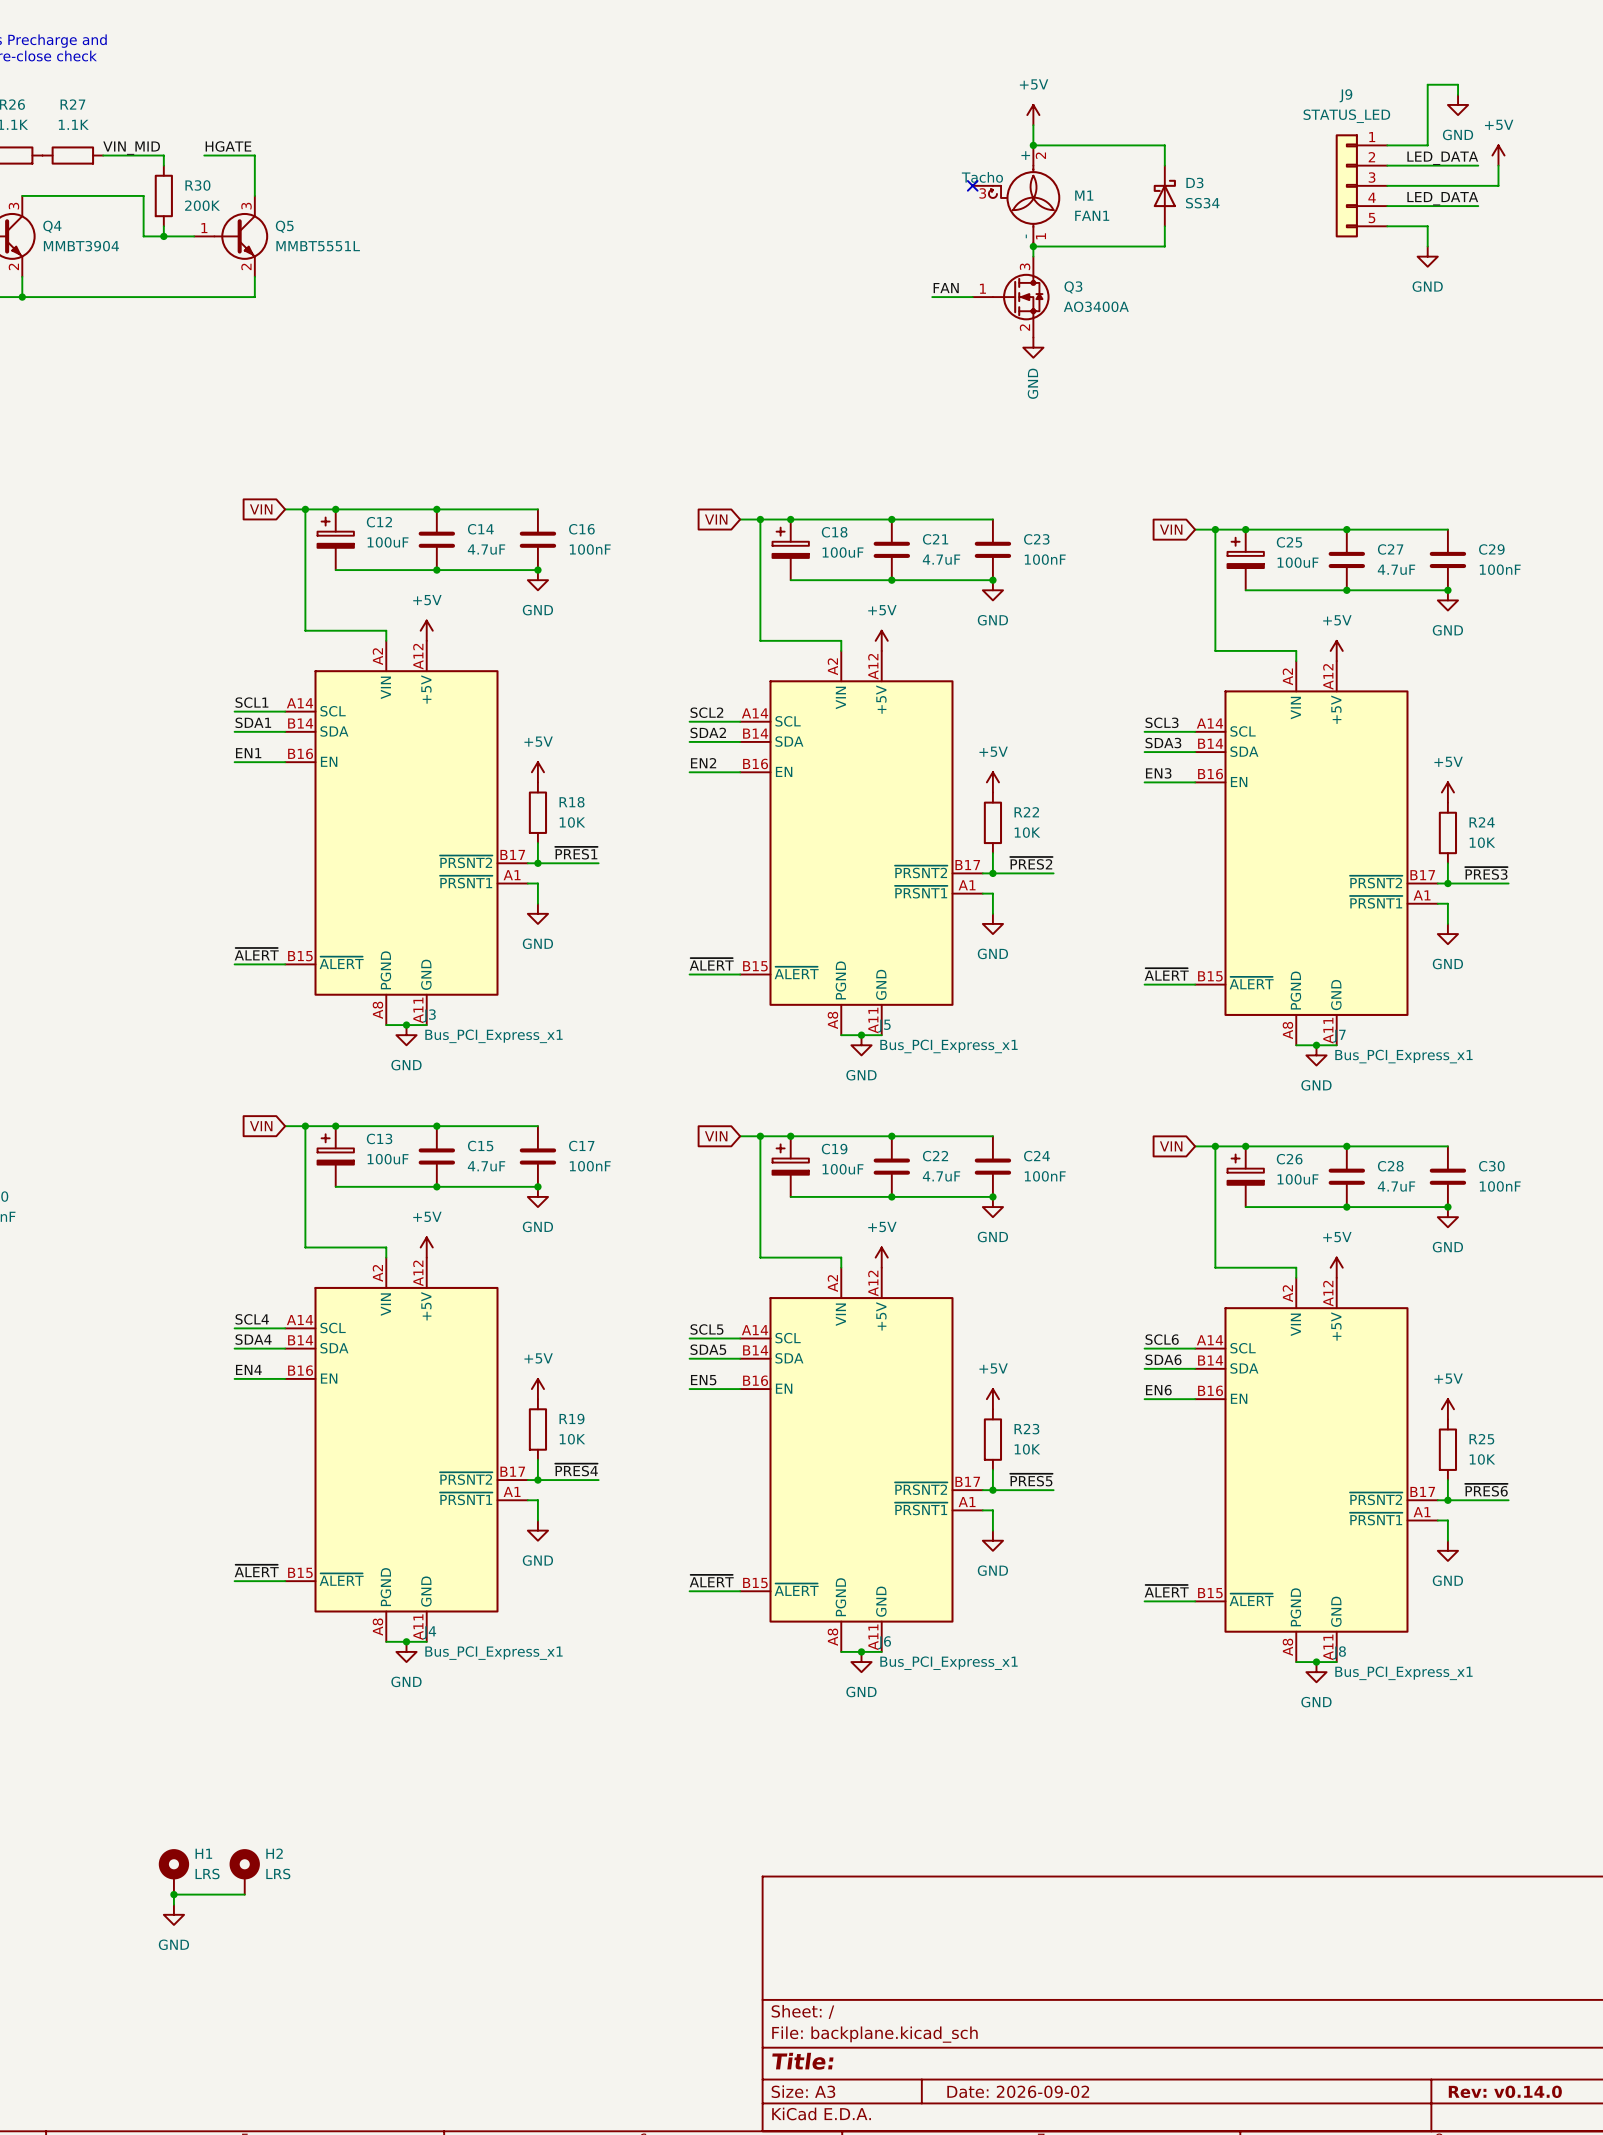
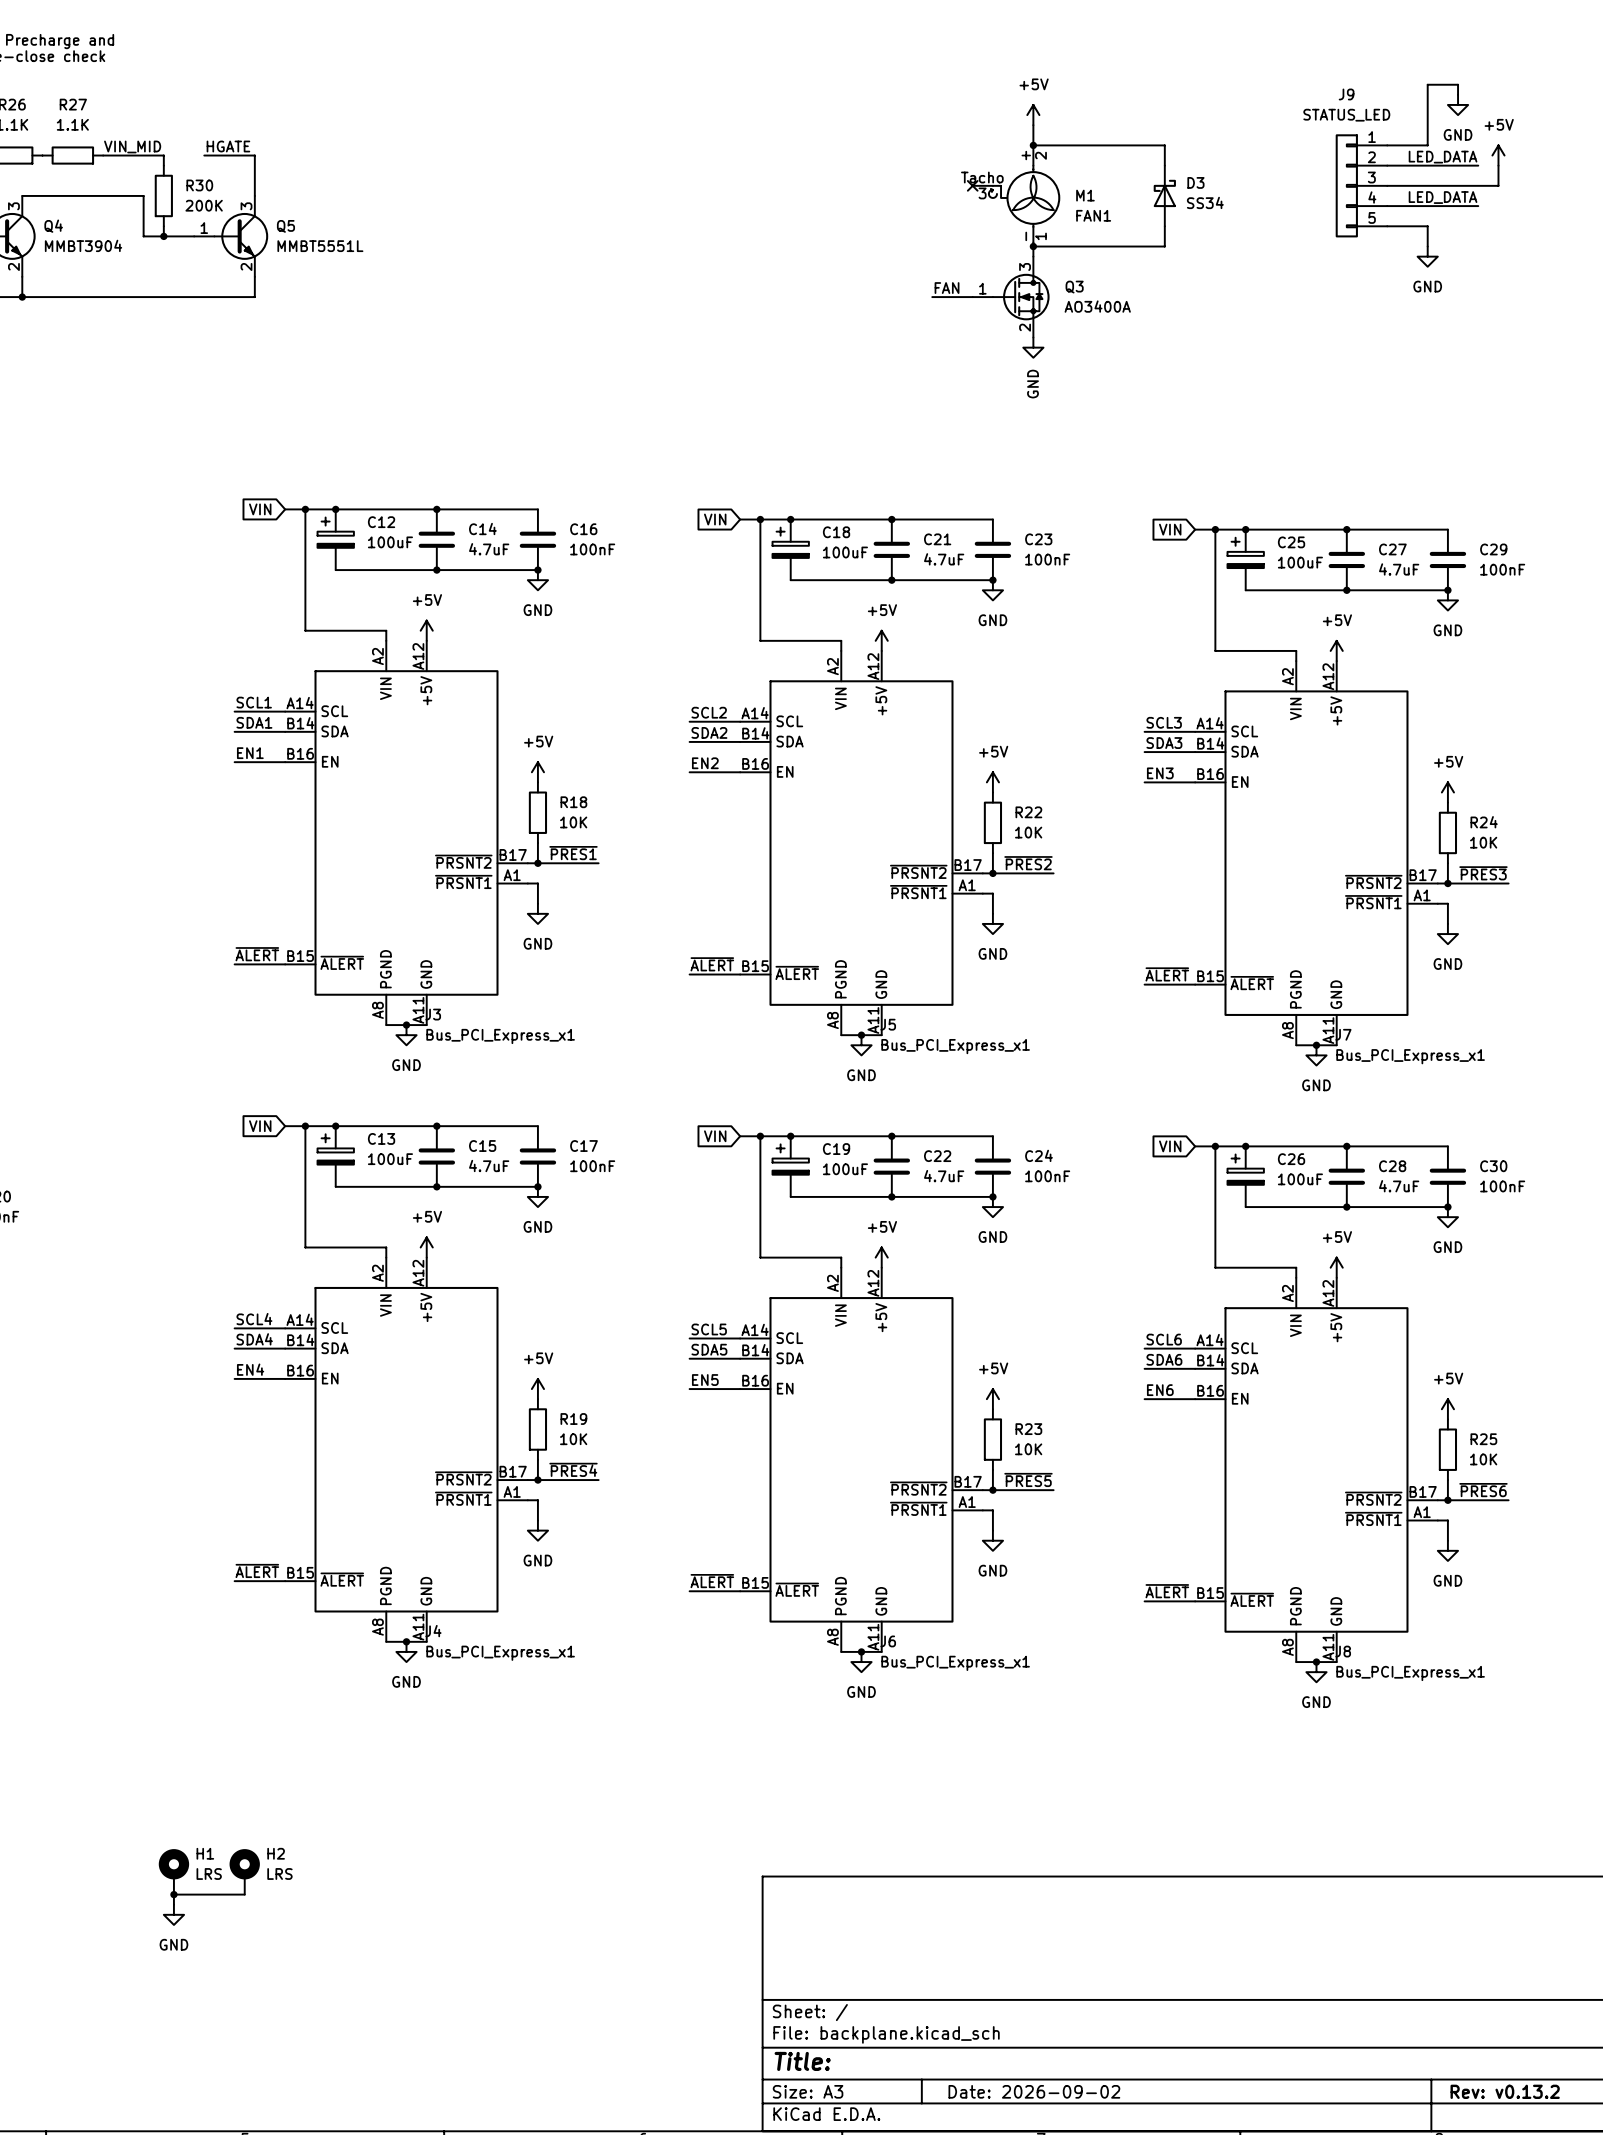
title block: Rev: v0.14.0 (1505, 2091) -> Rev: v0.13.2 (1505, 2091)

